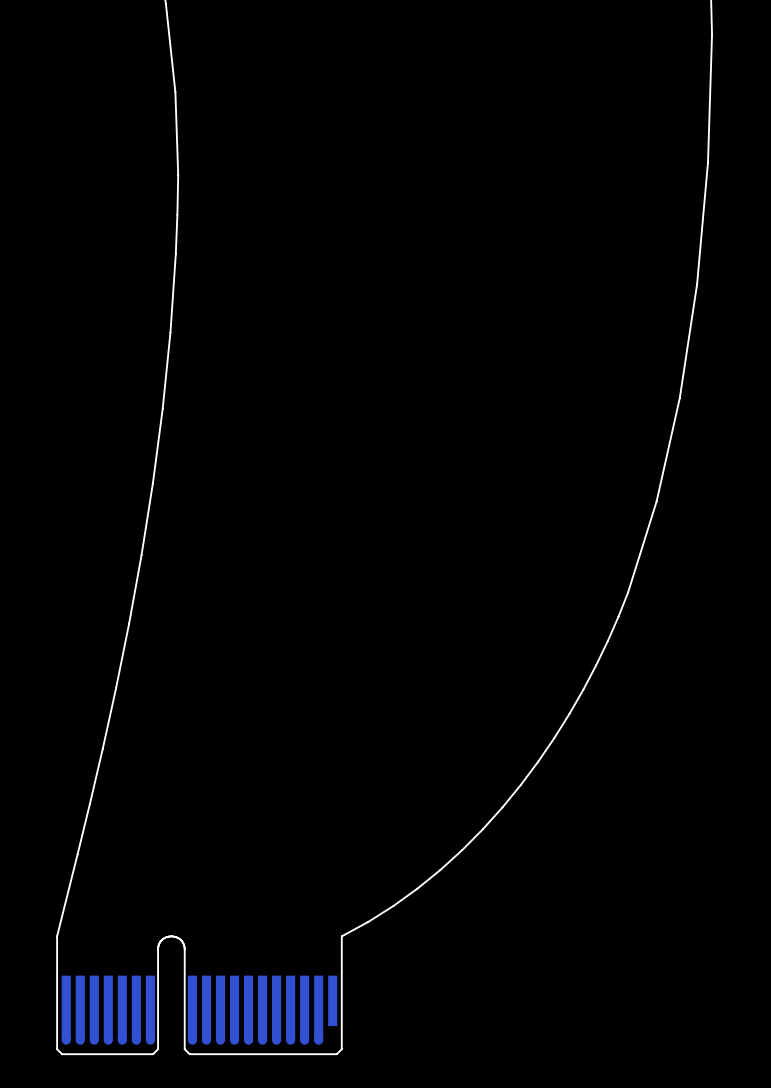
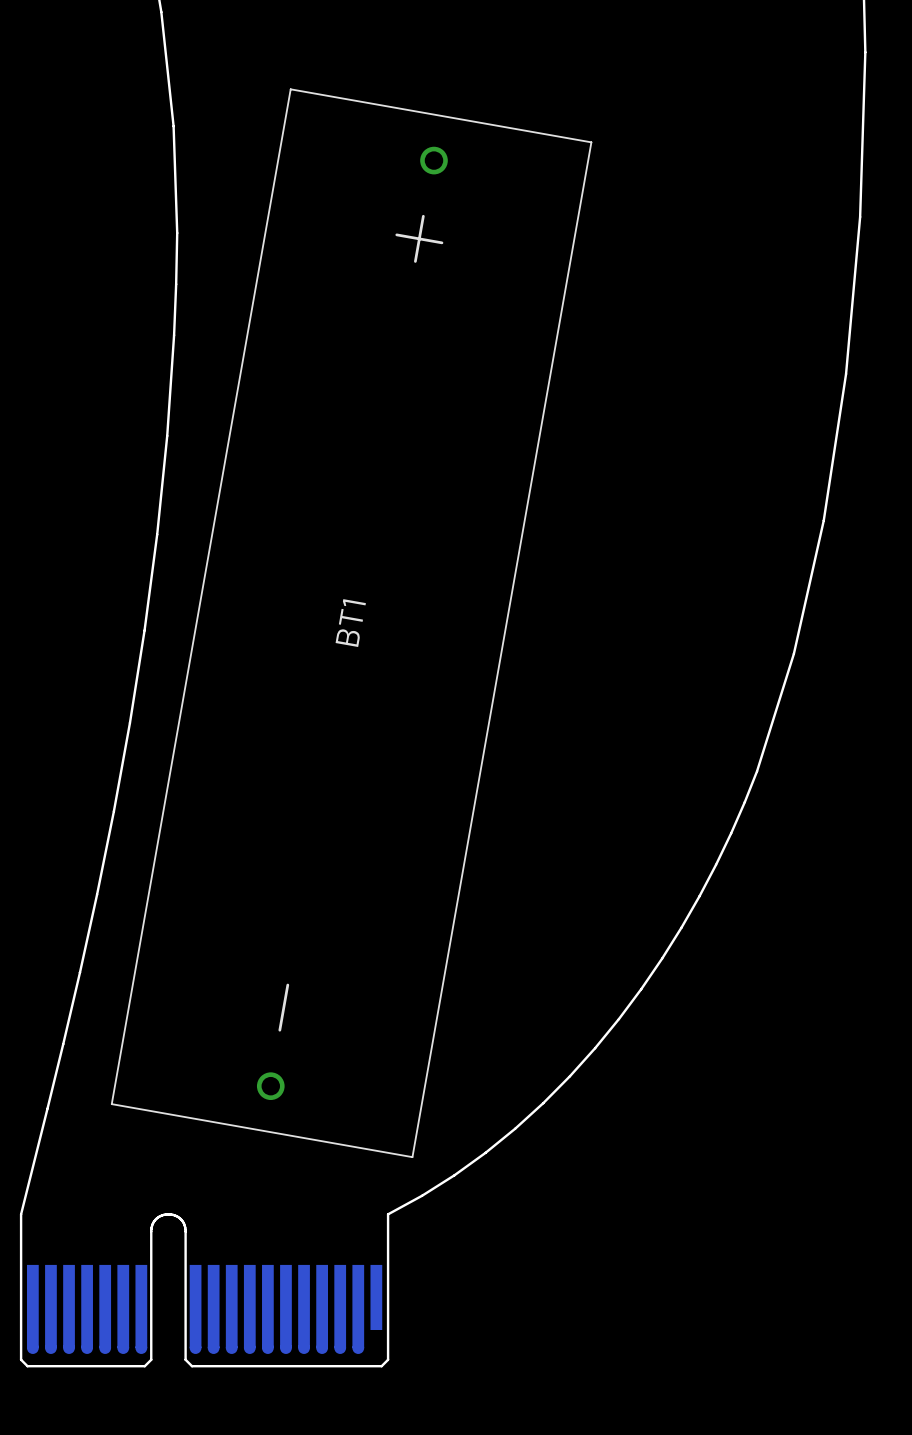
BT1: none -> (351, 623)

